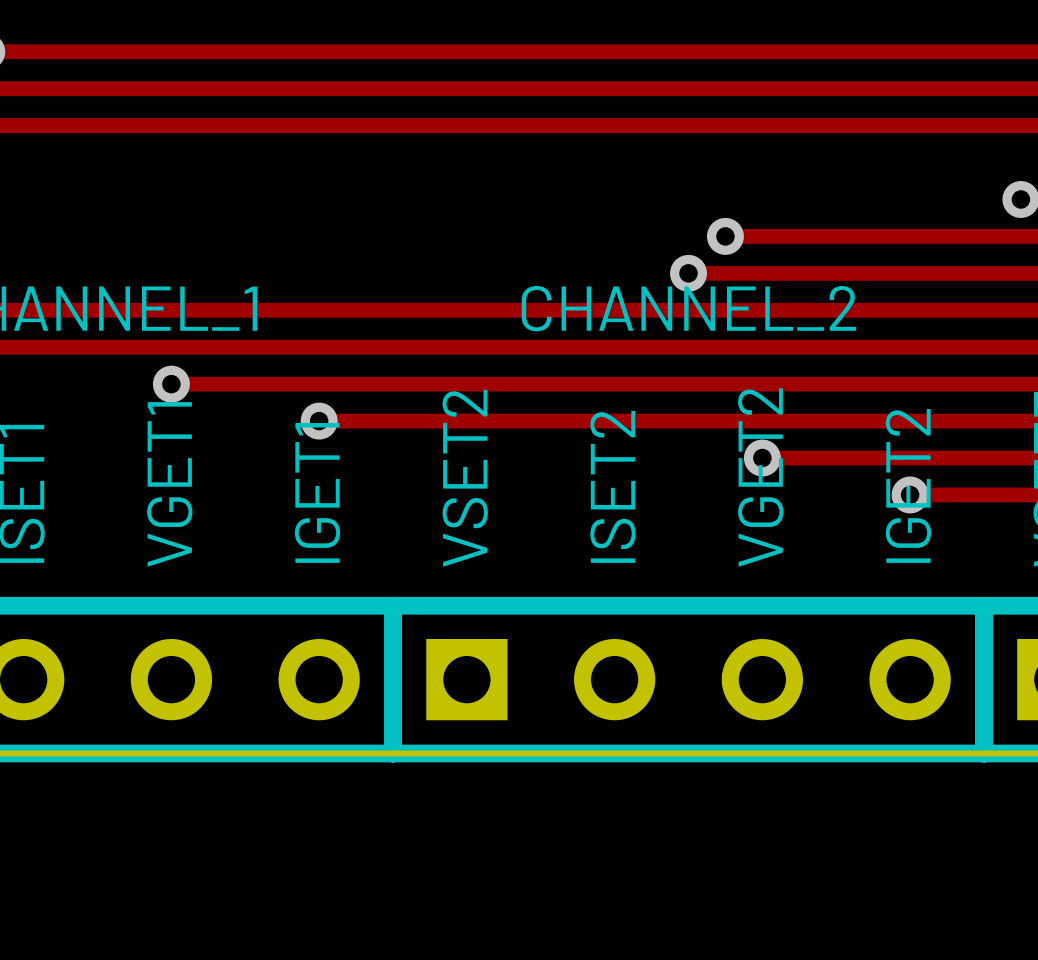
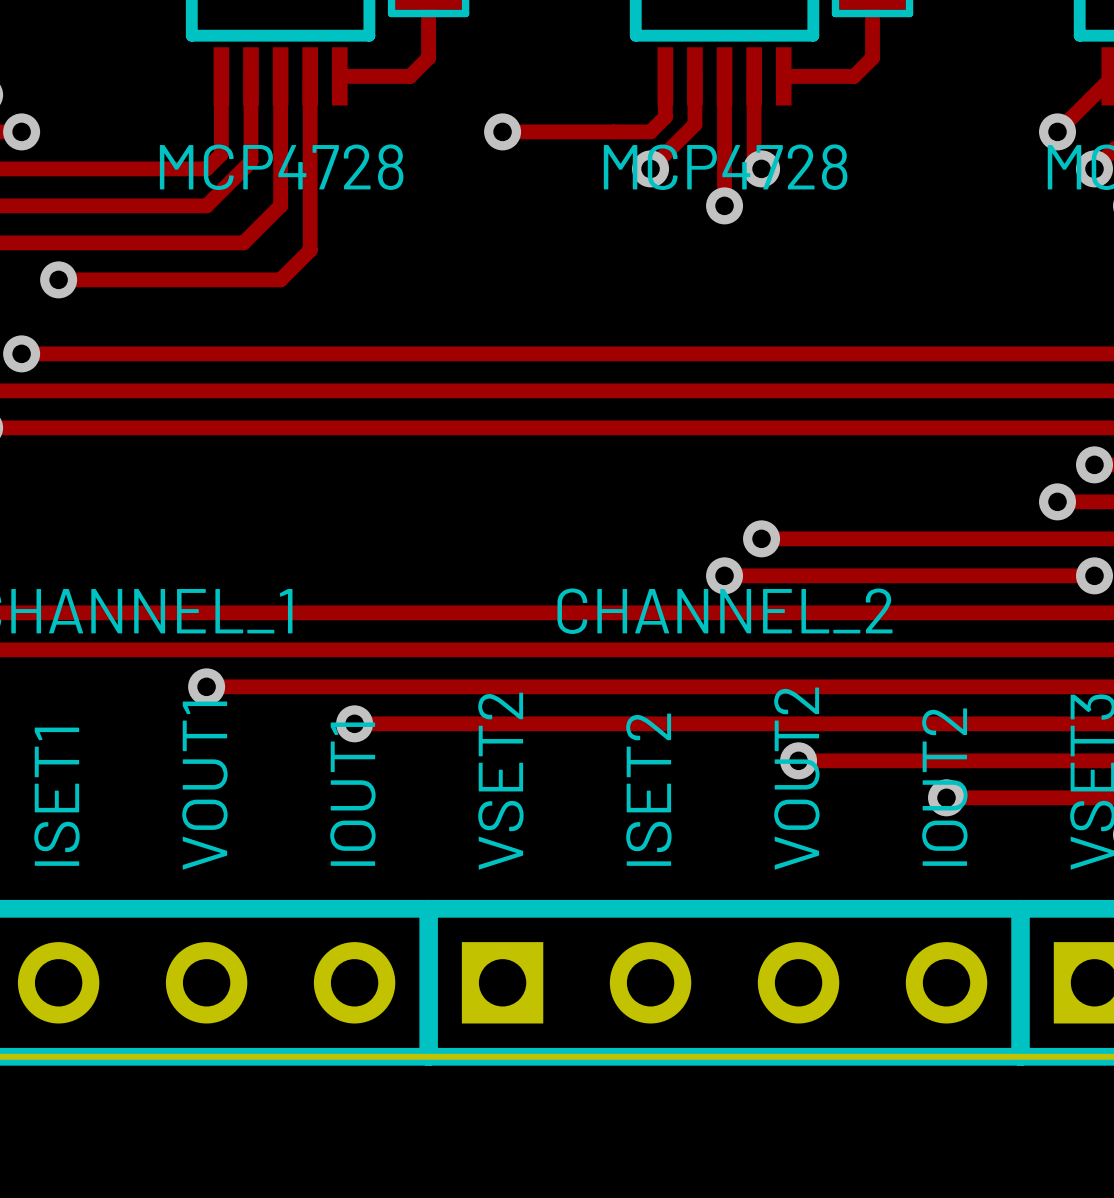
text: VGET2 (760, 477) -> VOUT2 (796, 778)
text: VGET1 (169, 484) -> VOUT1 (204, 785)
text: IGET2 (908, 485) -> IOUT2 (944, 787)
text: IGET1 (317, 492) -> IOUT1 (352, 794)

